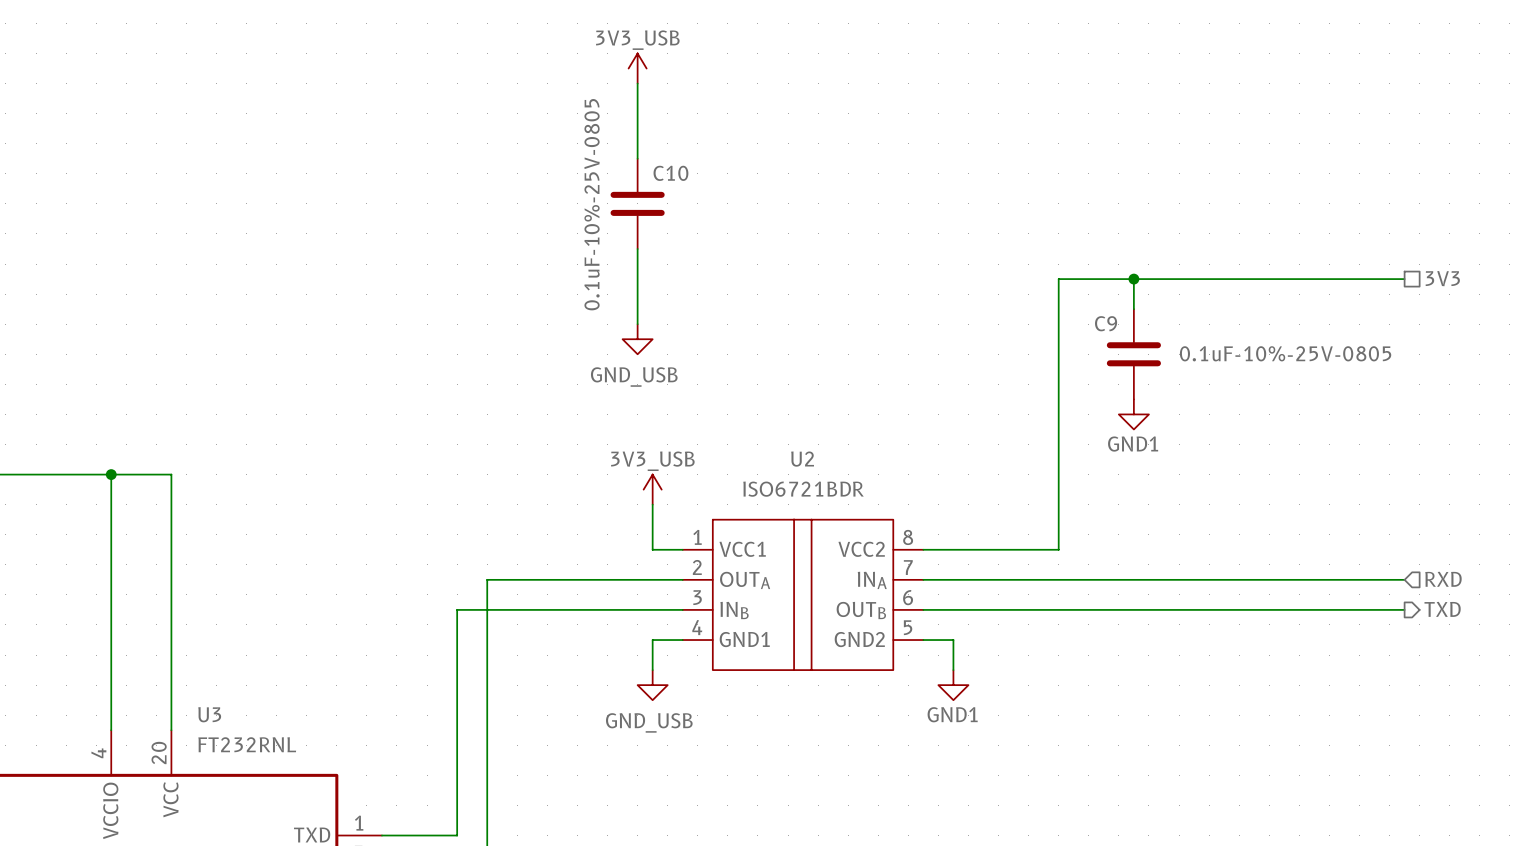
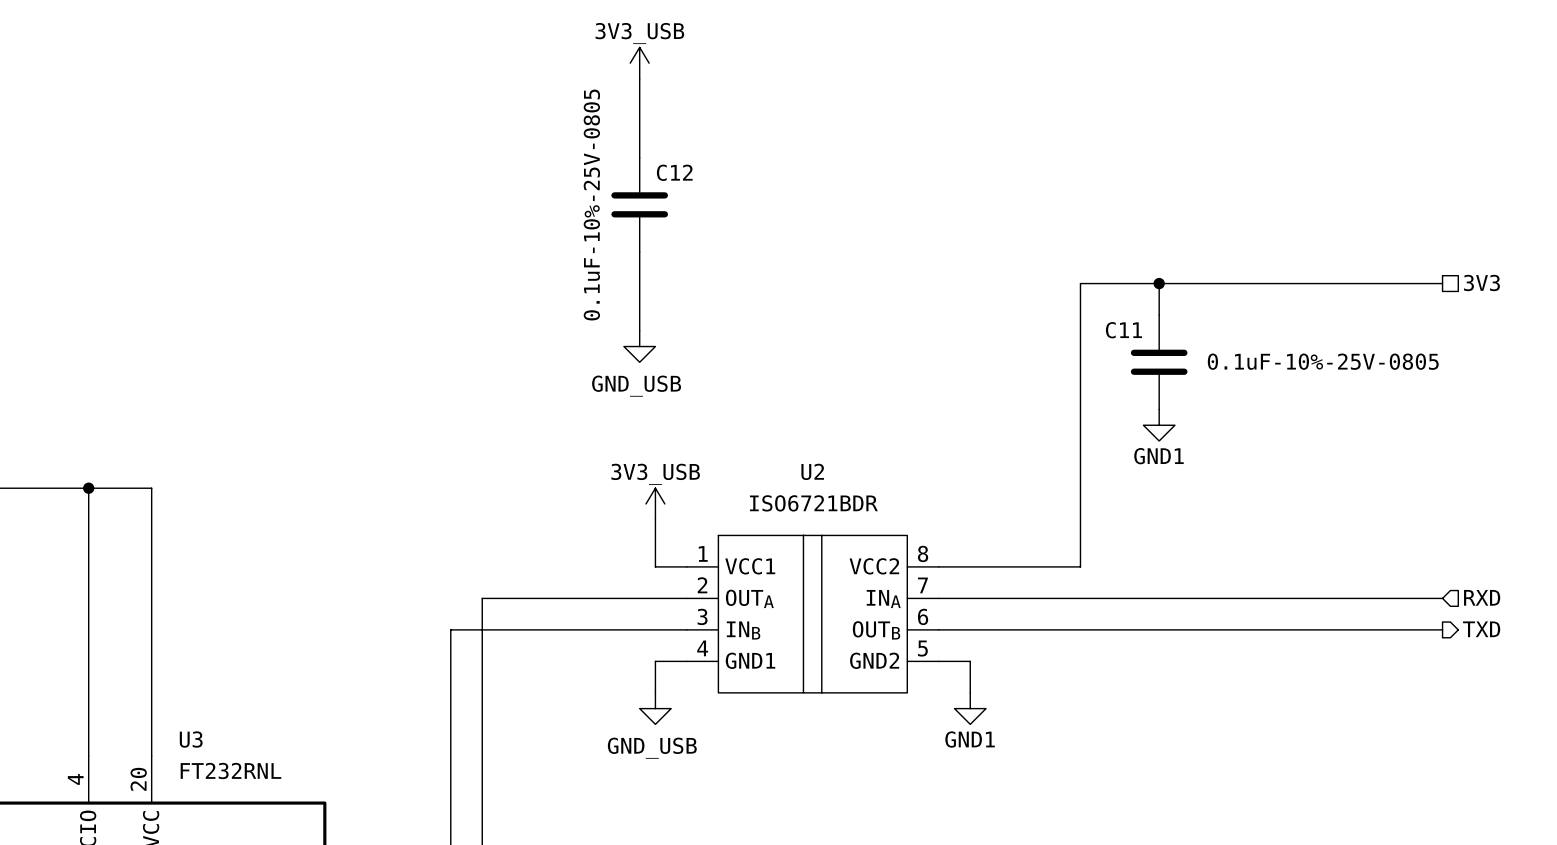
C10 name: C10 (670, 173) -> C12 (674, 172)
C9 name: C9 (1106, 323) -> C11 (1123, 330)

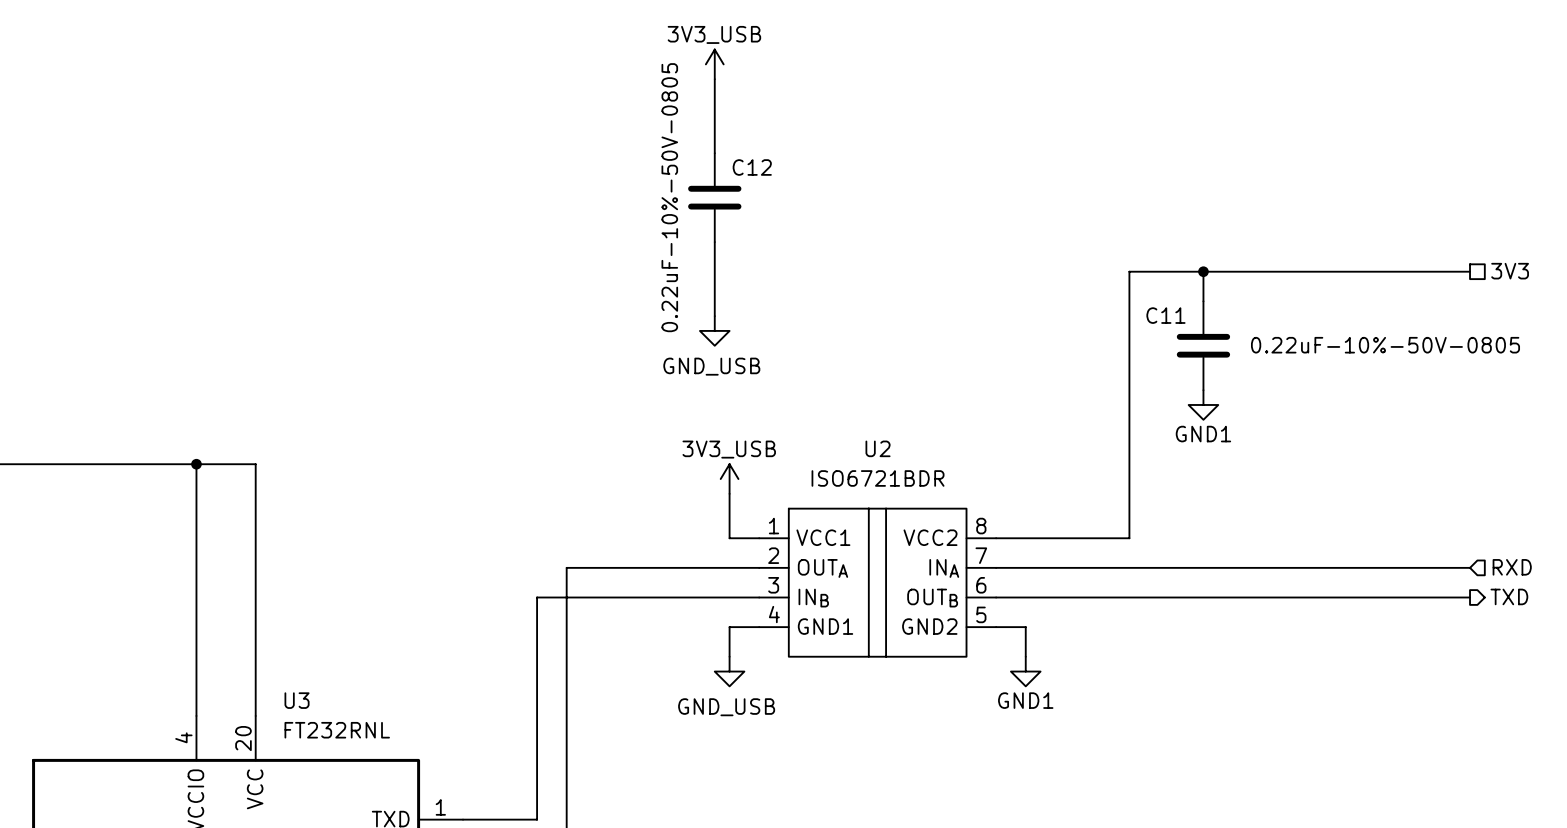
C12 value: 0.1uF-10%-25V-0805 (591, 205) -> 0.22uF-10%-50V-0805 (669, 197)
C11 value: 0.1uF-10%-25V-0805 (1323, 361) -> 0.22uF-10%-50V-0805 (1385, 345)

